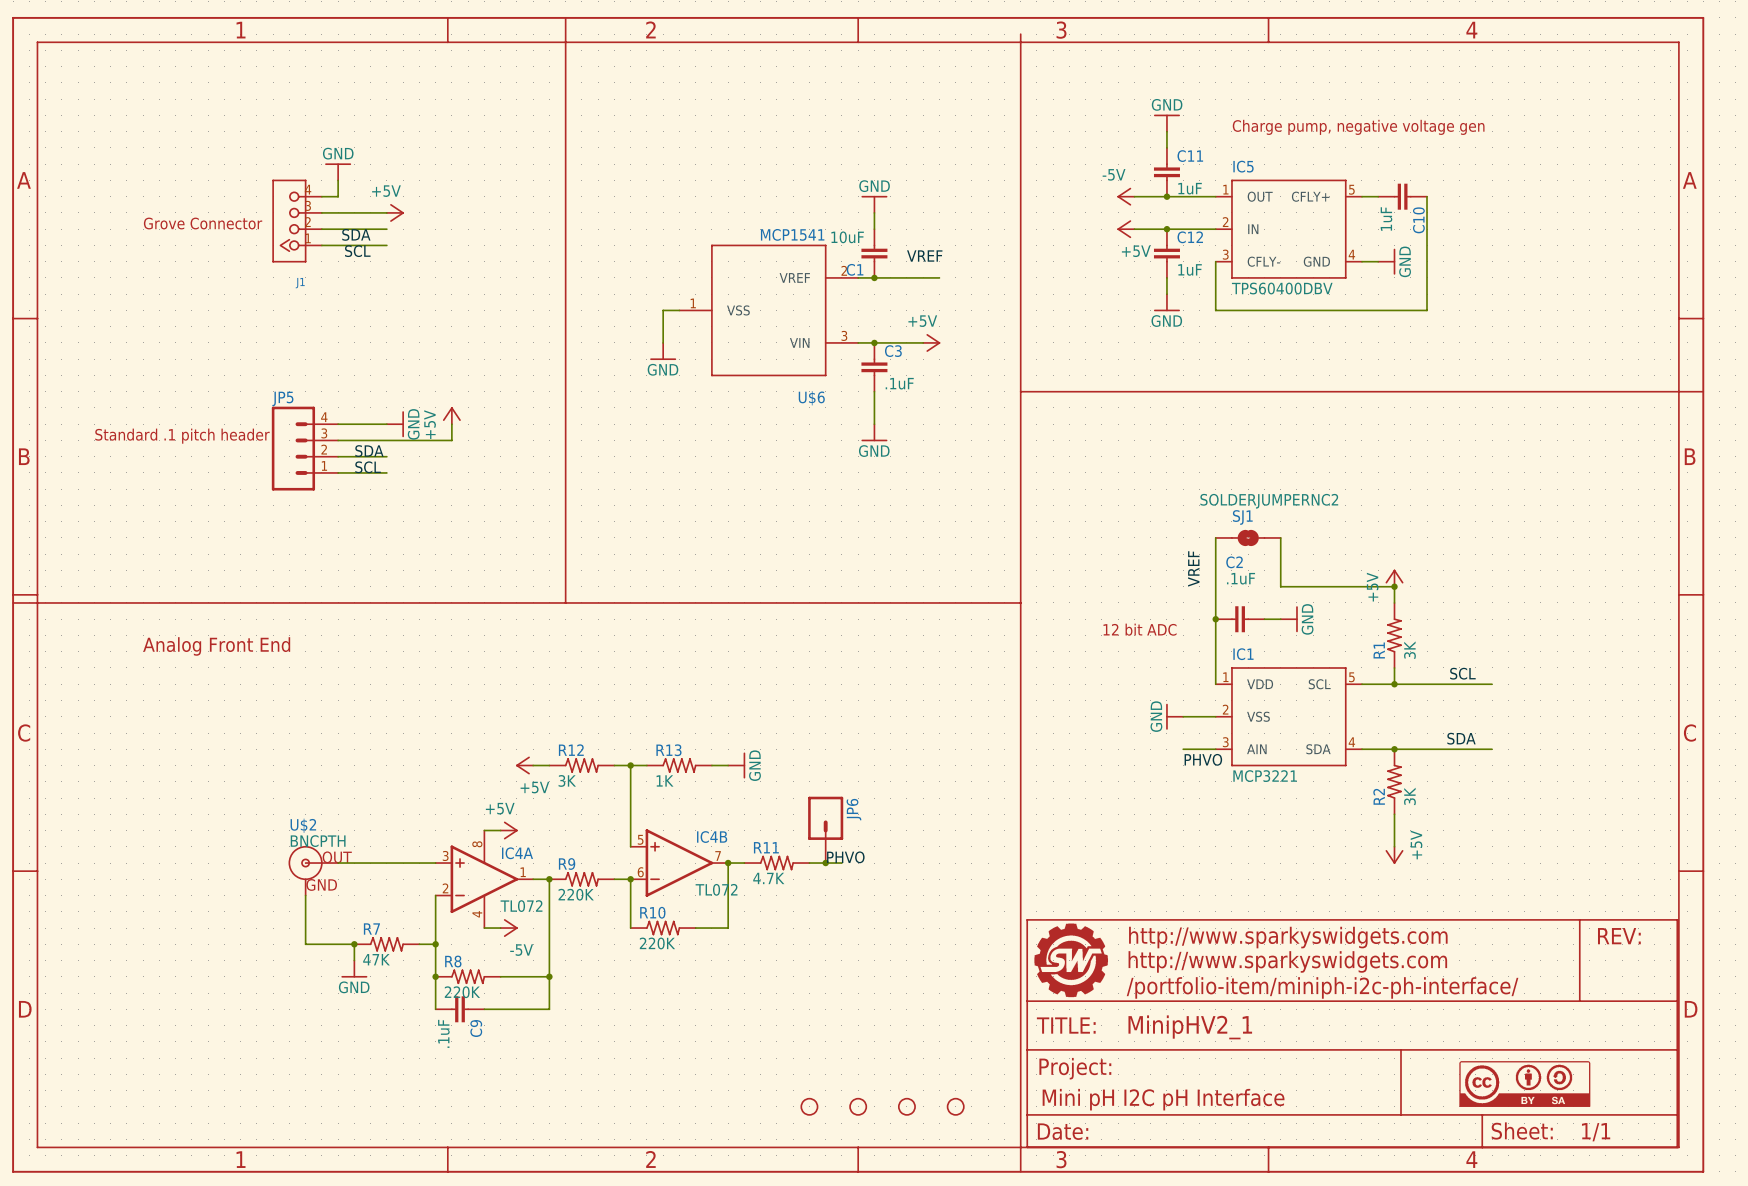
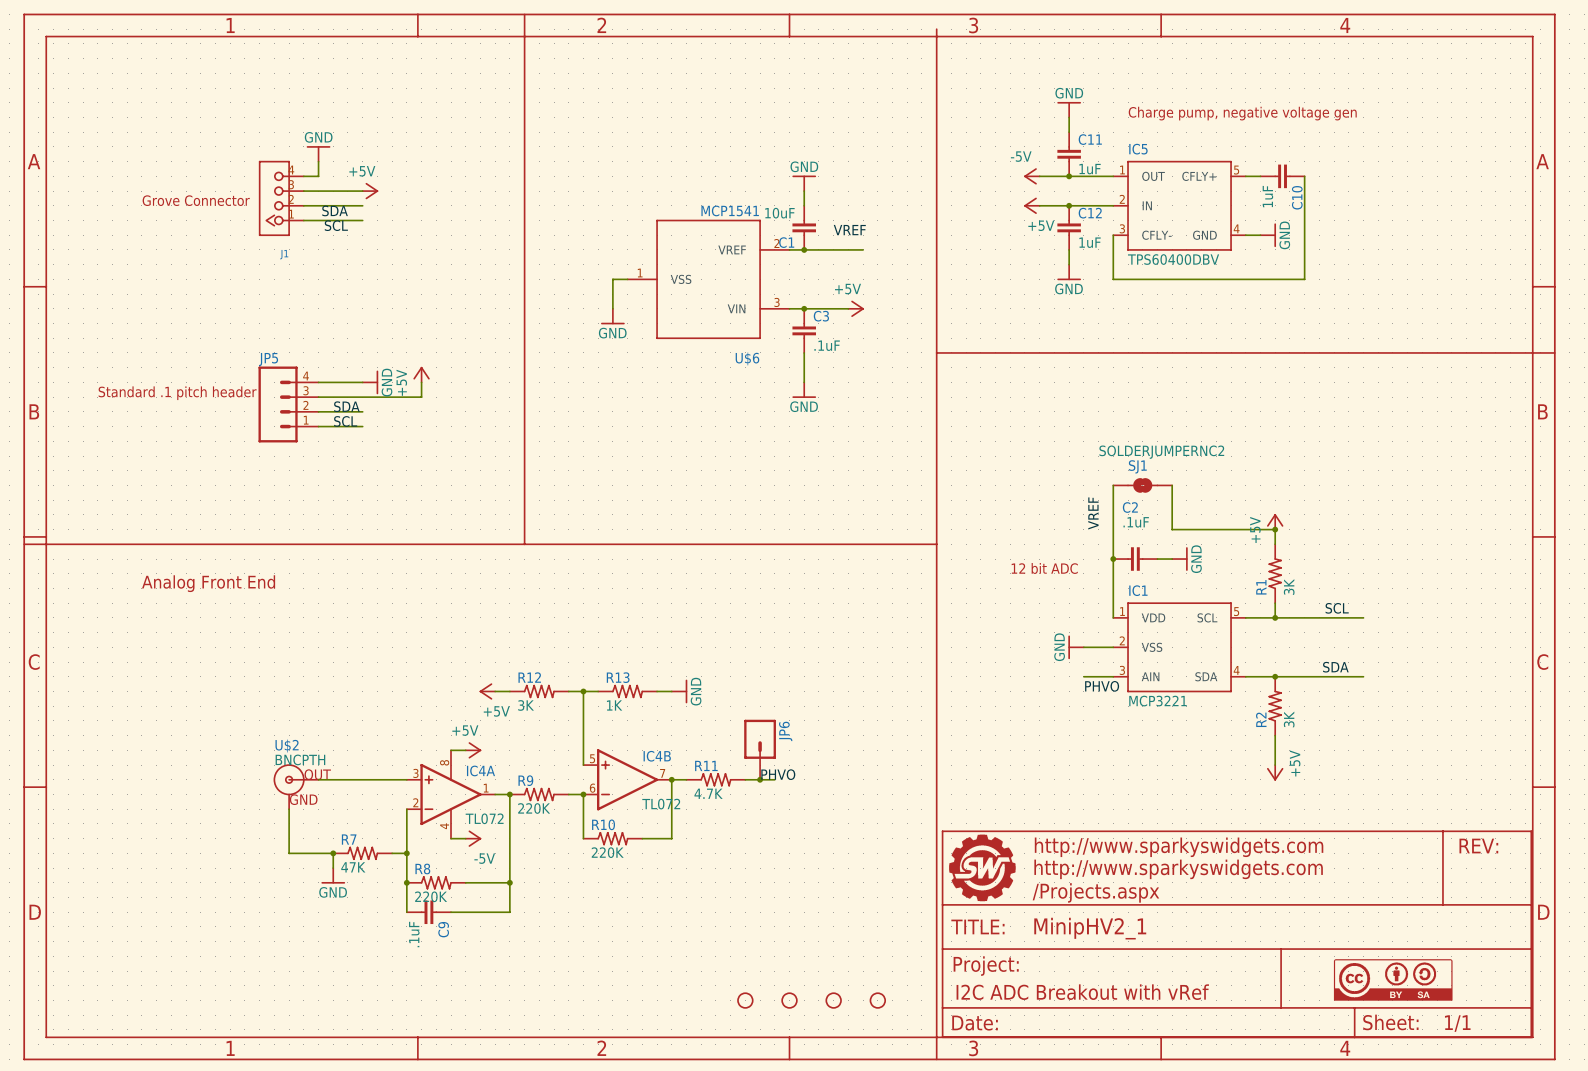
part text: /portfolio-item/miniph-i2c-ph-interface/ (1322, 987) -> /Projects.aspx (1095, 892)
part text: Mini pH I2C pH Interface (1163, 1099) -> I2C ADC Breakout with vRef (1082, 992)

